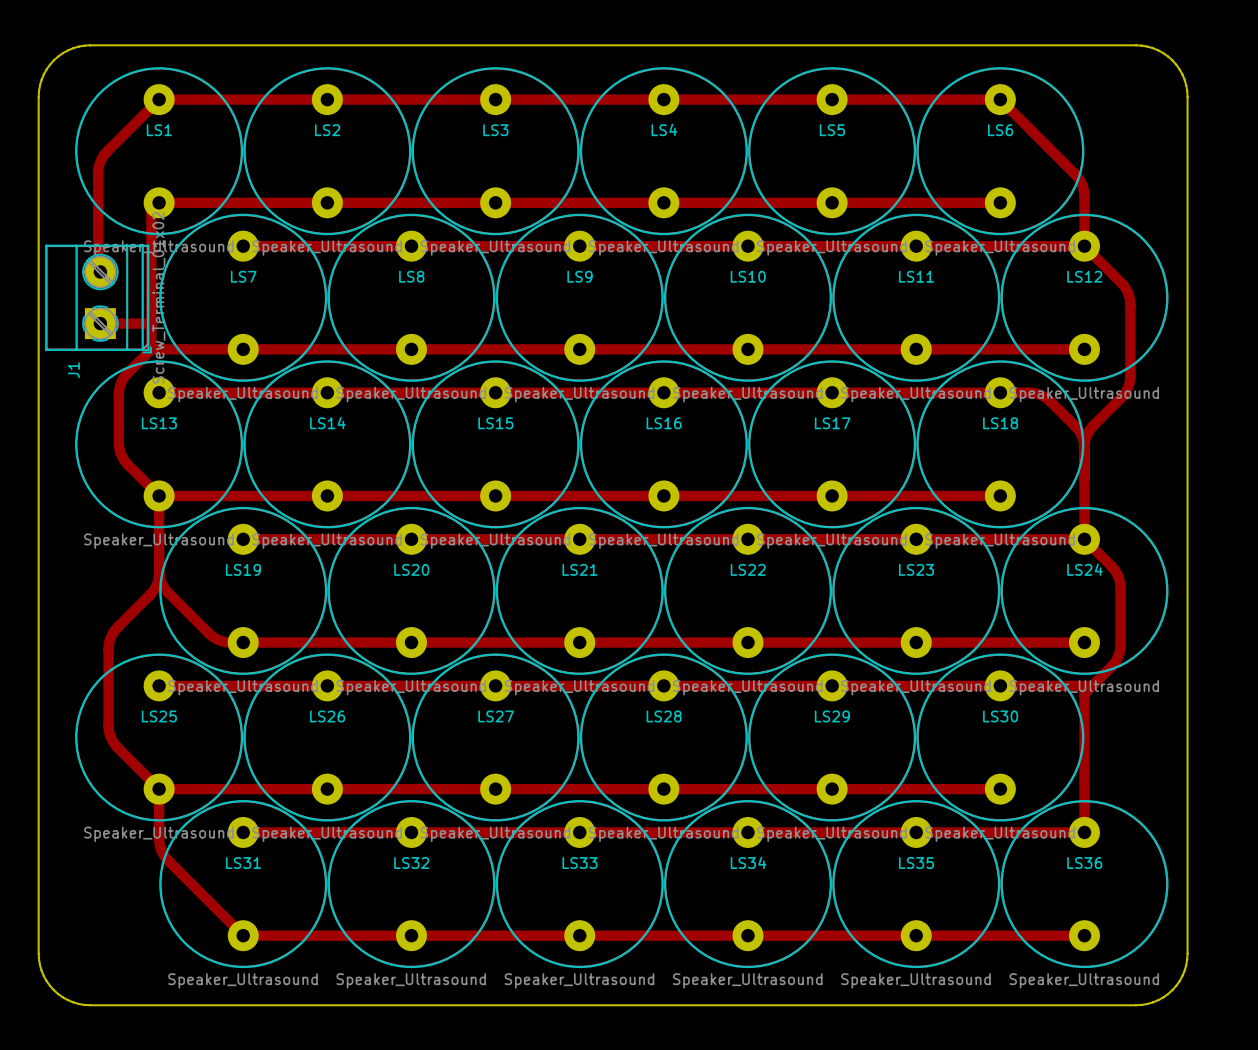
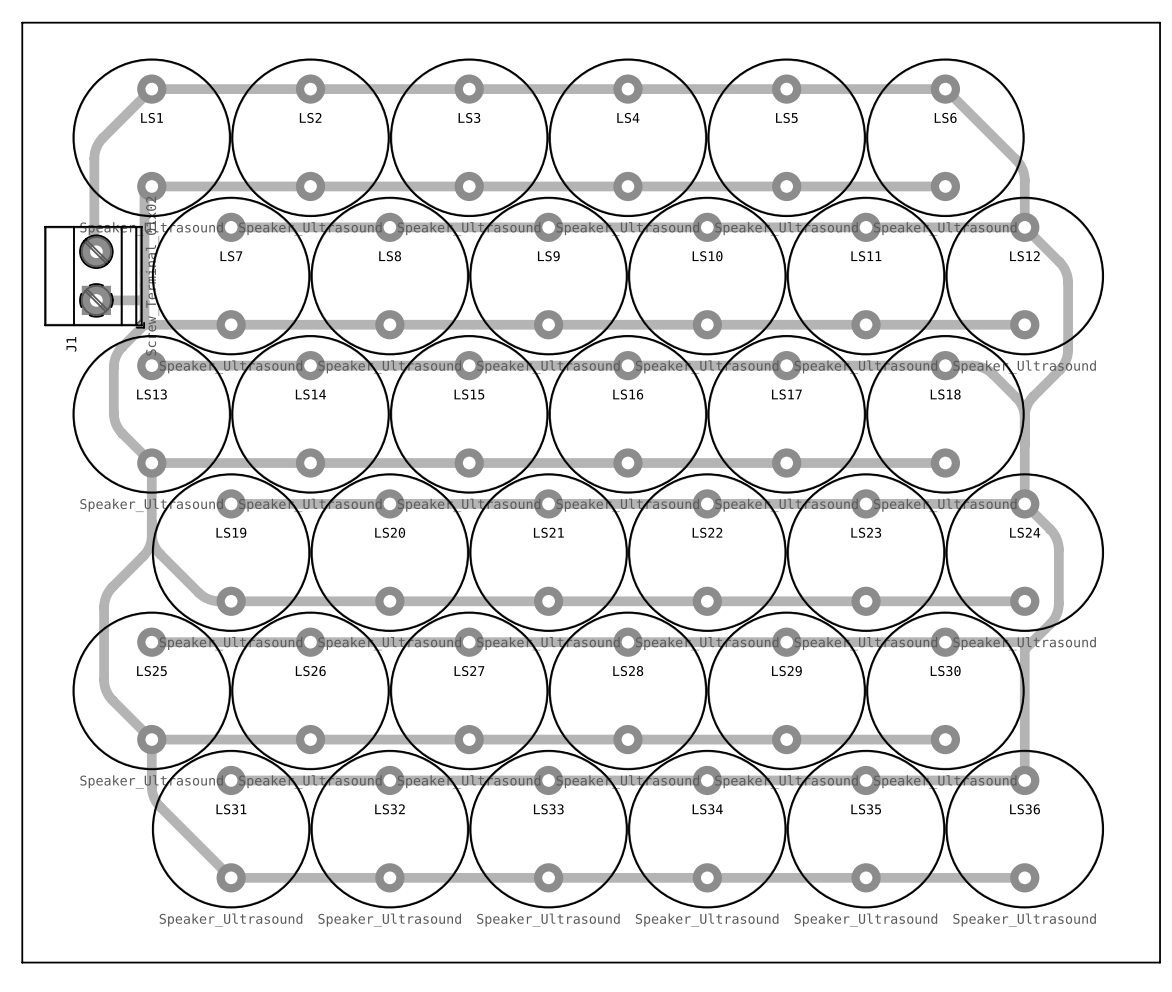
board edge: (90, 45) (1135, 45) (1152, 48) (1168, 56) (1182, 74) (1187, 96) (1187, 953) (1184, 970) (1176, 985) (1158, 1000) (1135, 1005) (90, 1005) (73, 1002) (58, 994) (43, 976) (38, 953) (38, 96) (41, 79) (53, 60) (67, 50) (90, 45) -> (22, 22) (22, 962) (1160, 962) (1160, 22) (22, 22)

